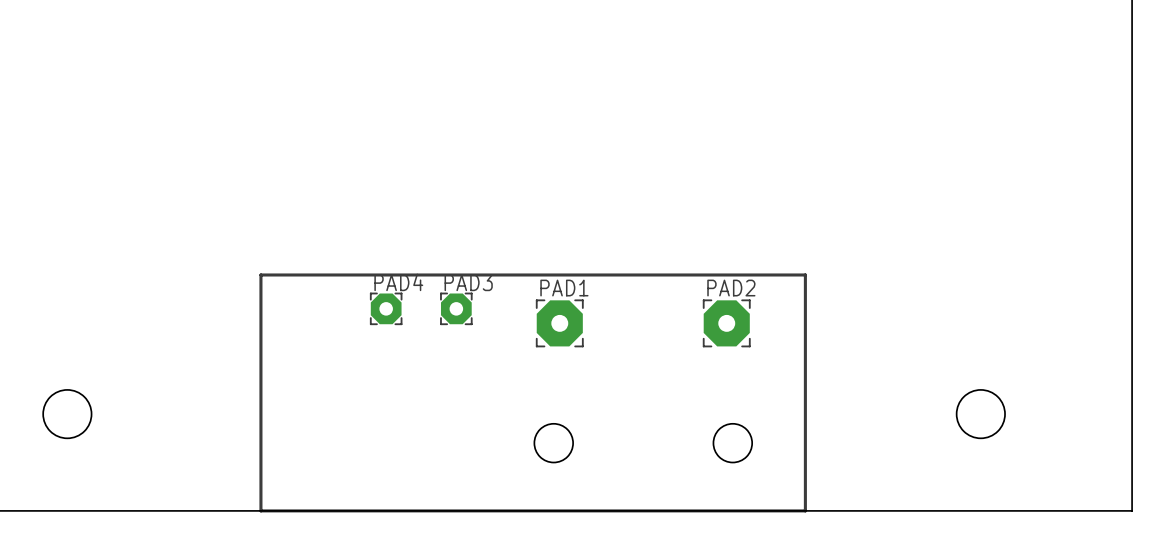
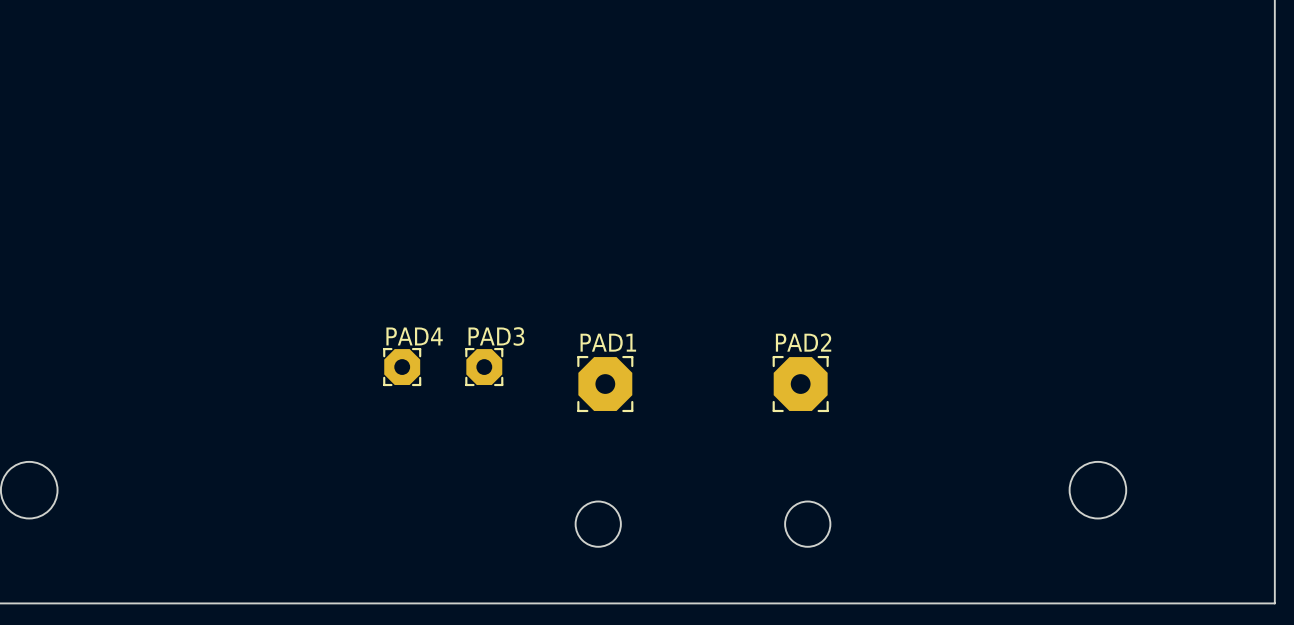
line: (260, 274) (260, 510) (805, 510) (805, 274) (260, 274) -> none

